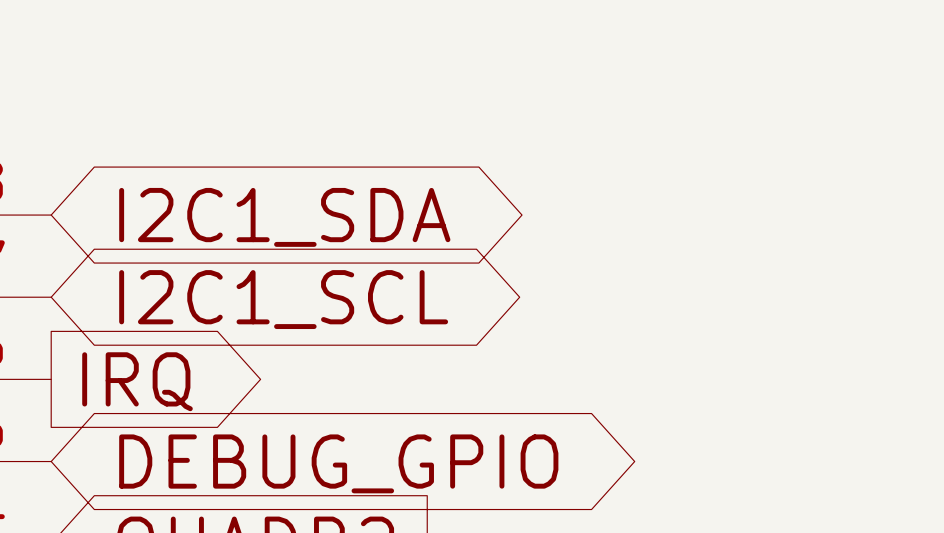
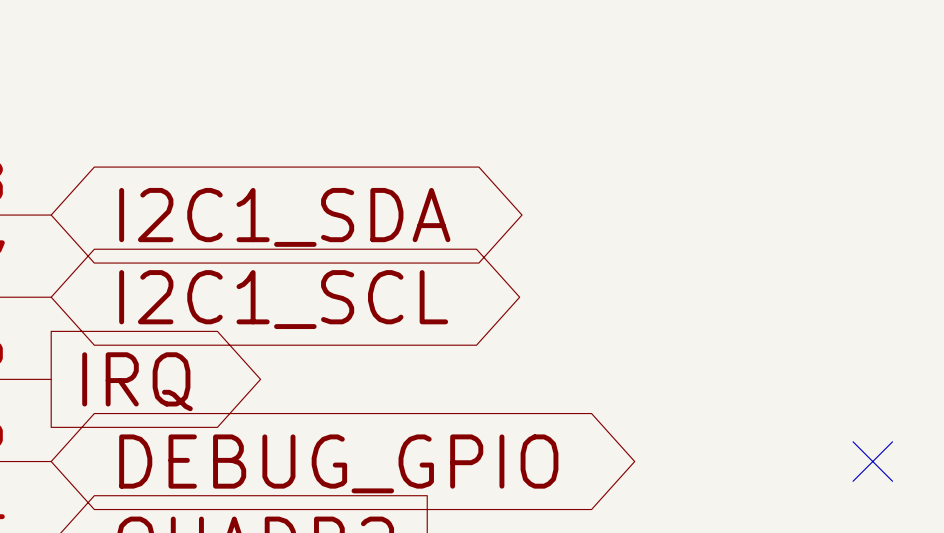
no-connect mark: none -> (872, 461)

